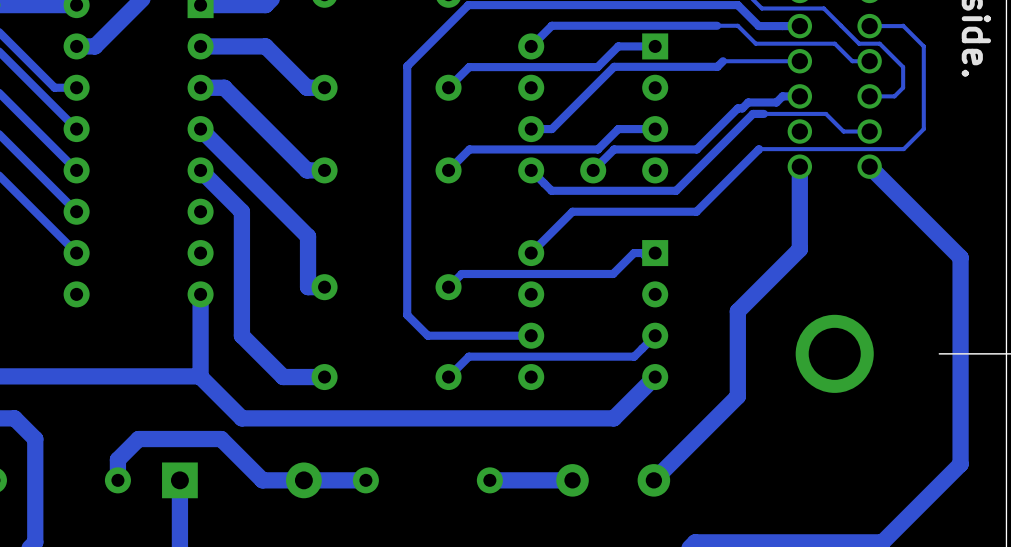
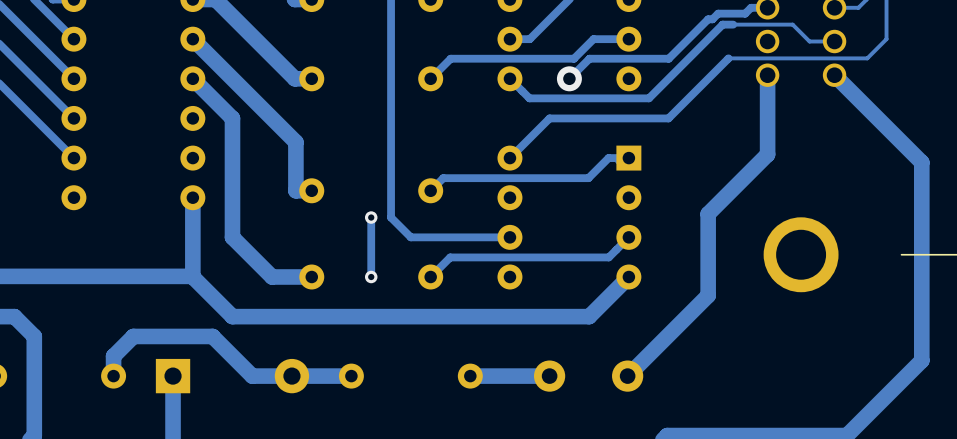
track: none -> (371, 217) (371, 276)
via: none -> (371, 217)
via: none -> (371, 276)

